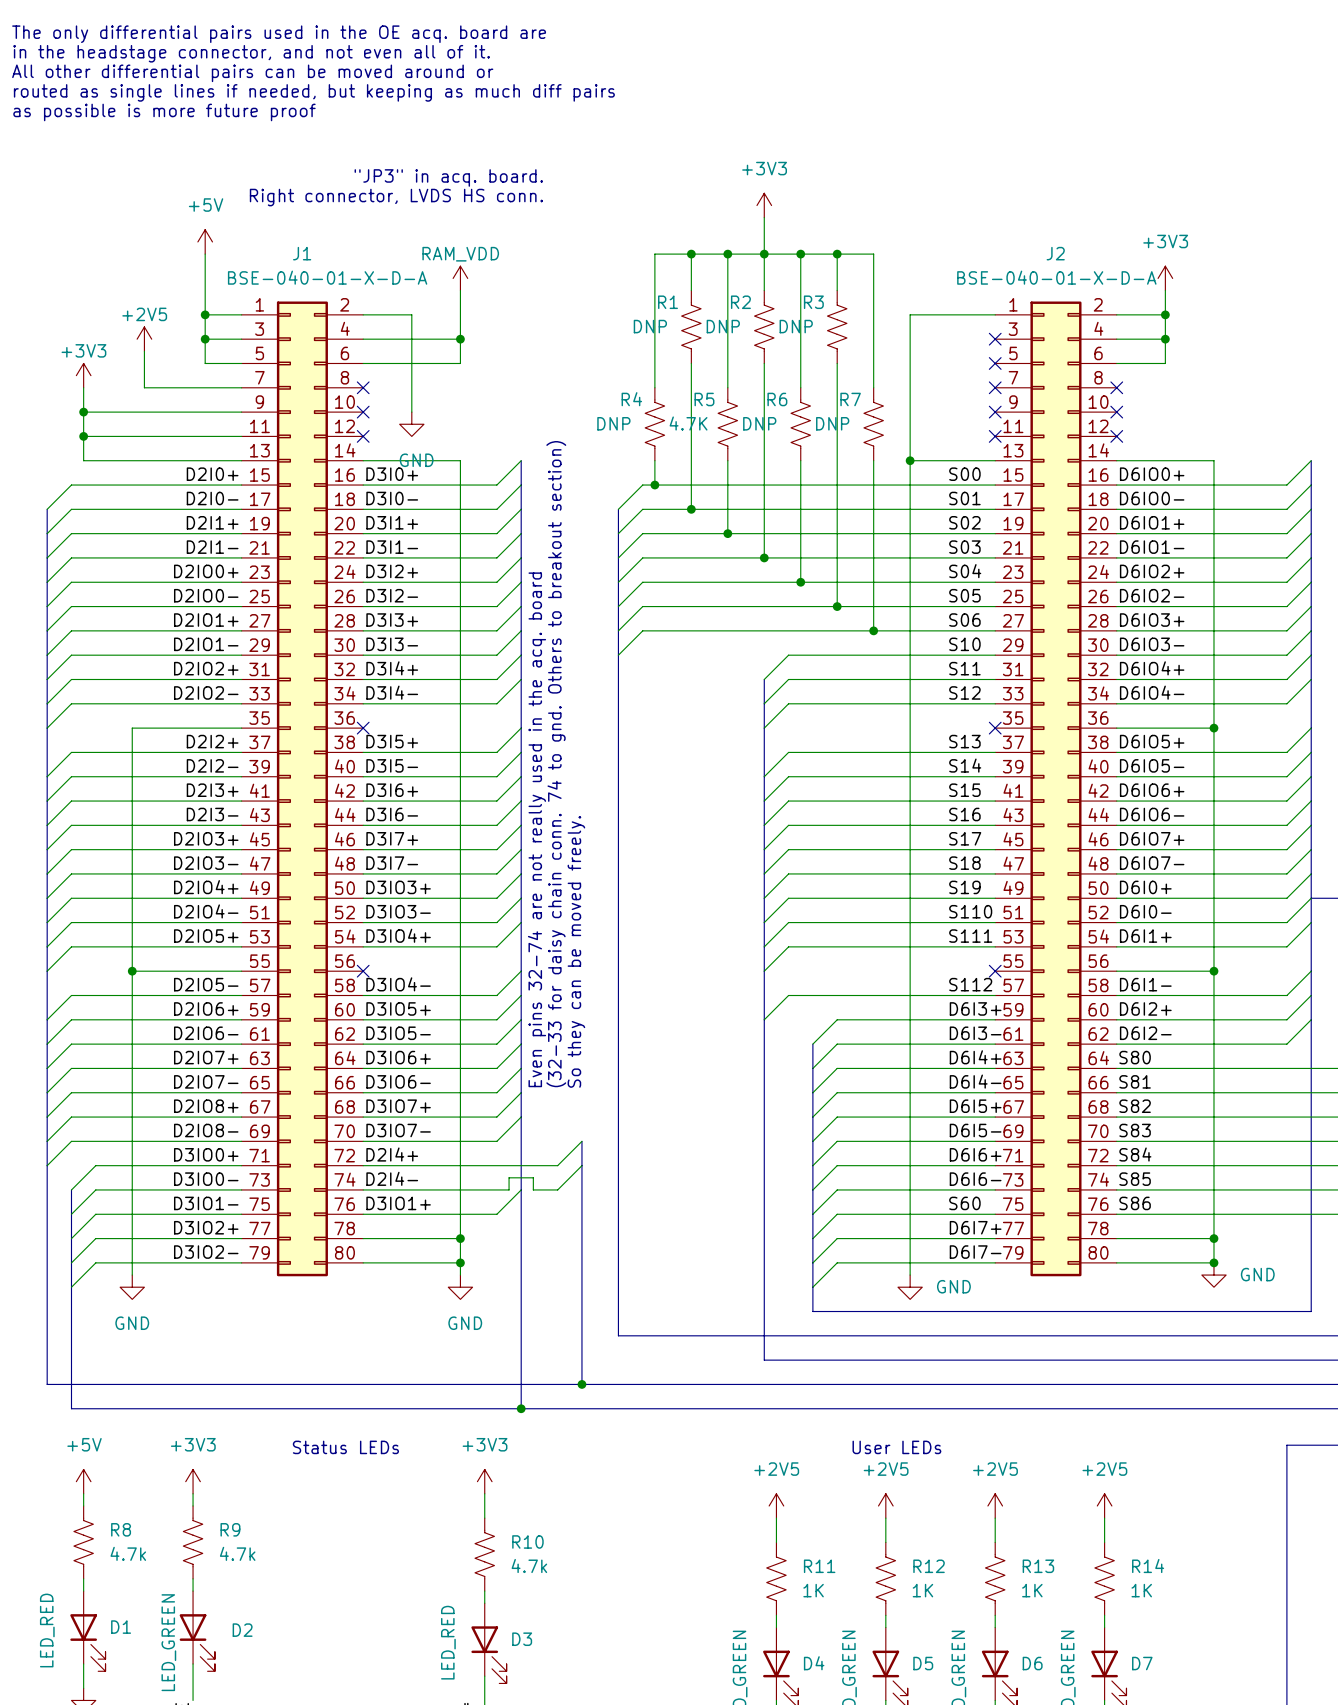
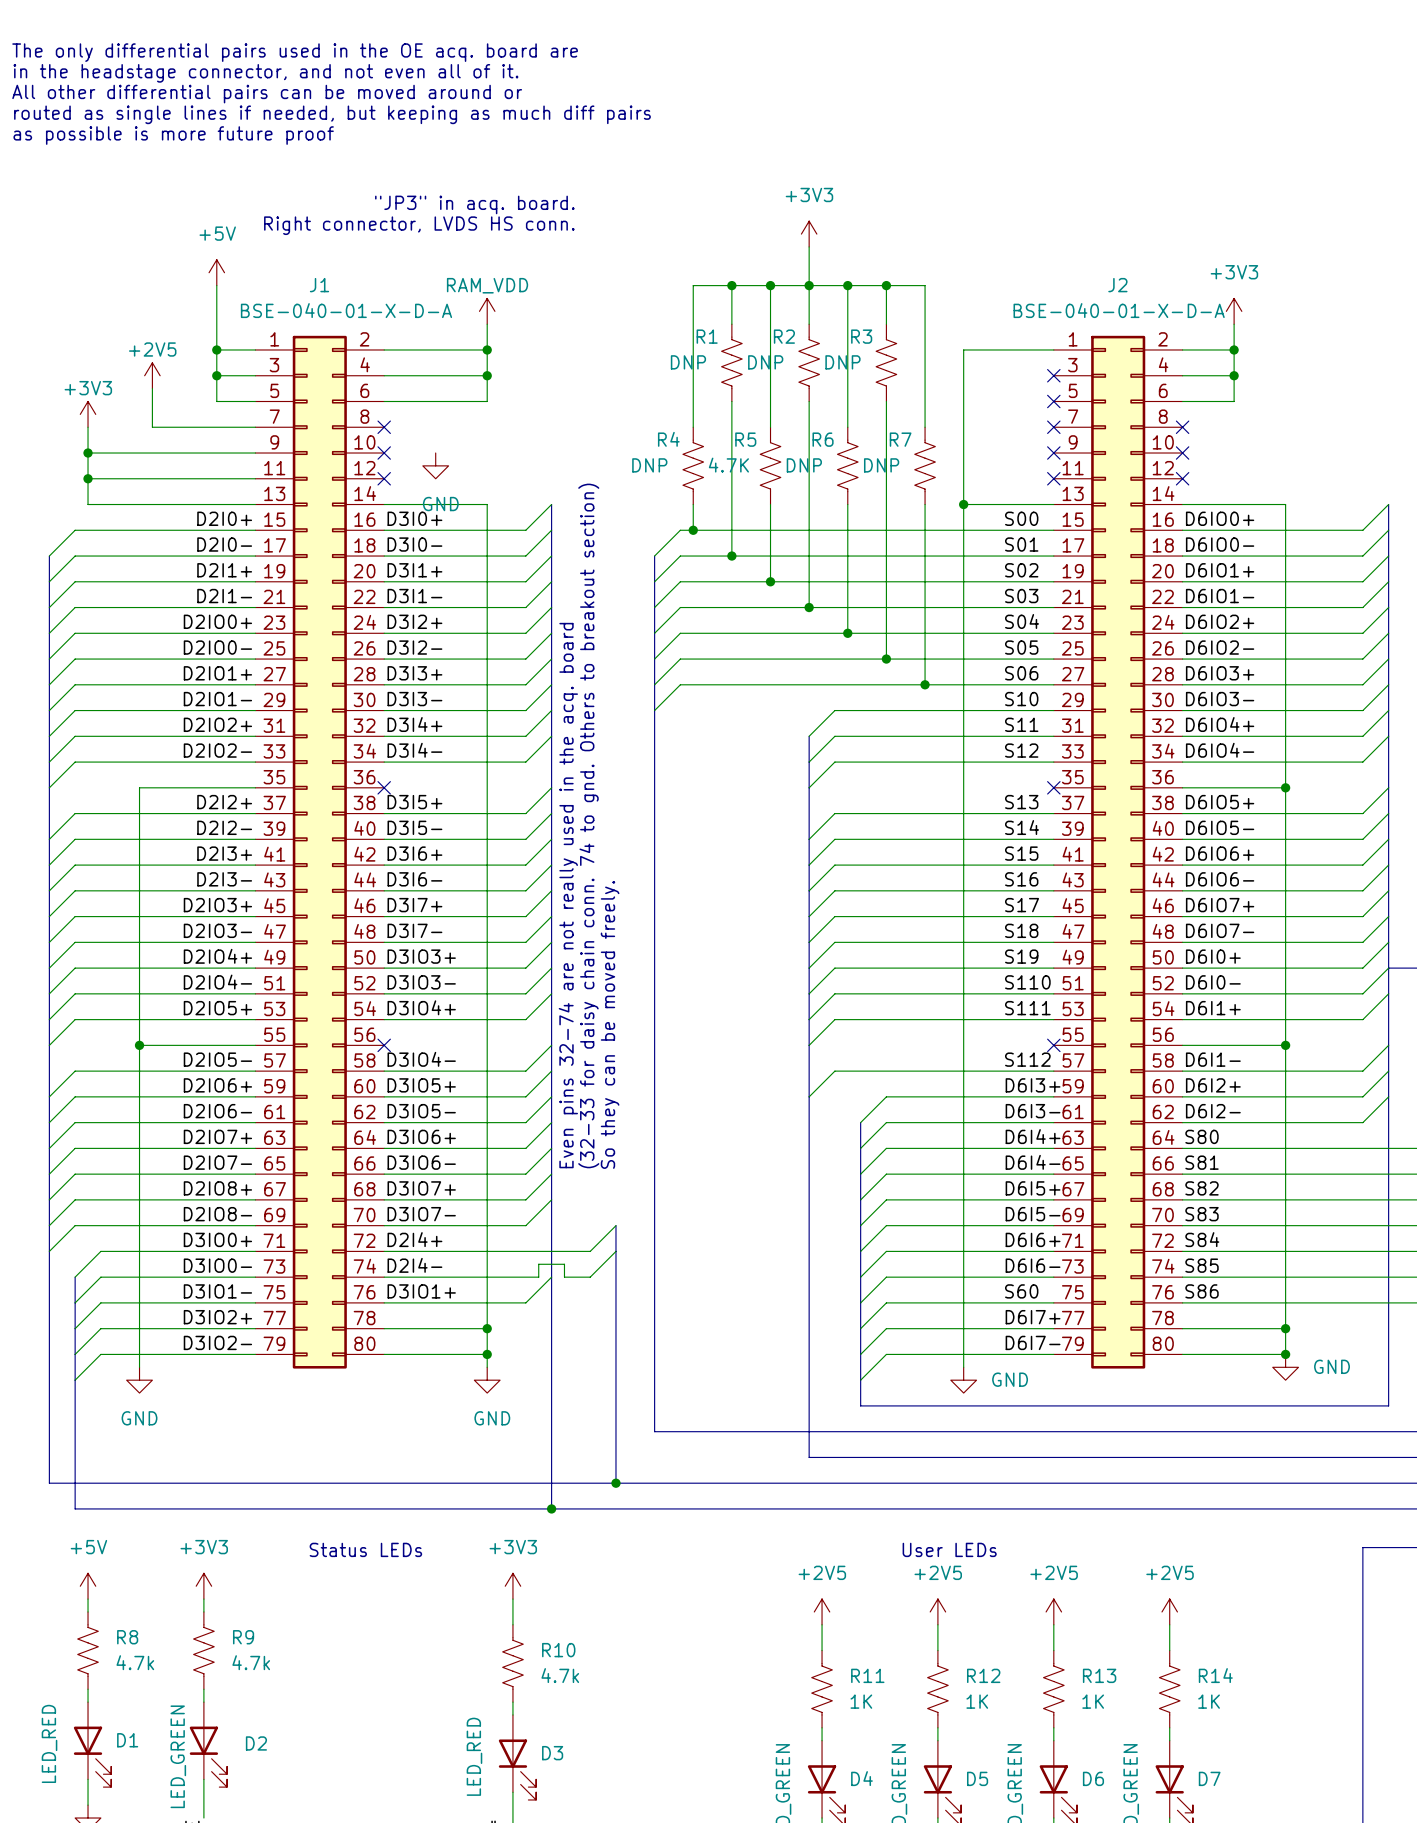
wire: (411, 314) (411, 412) -> (435, 349) (487, 349)
junction: none -> (487, 349)

